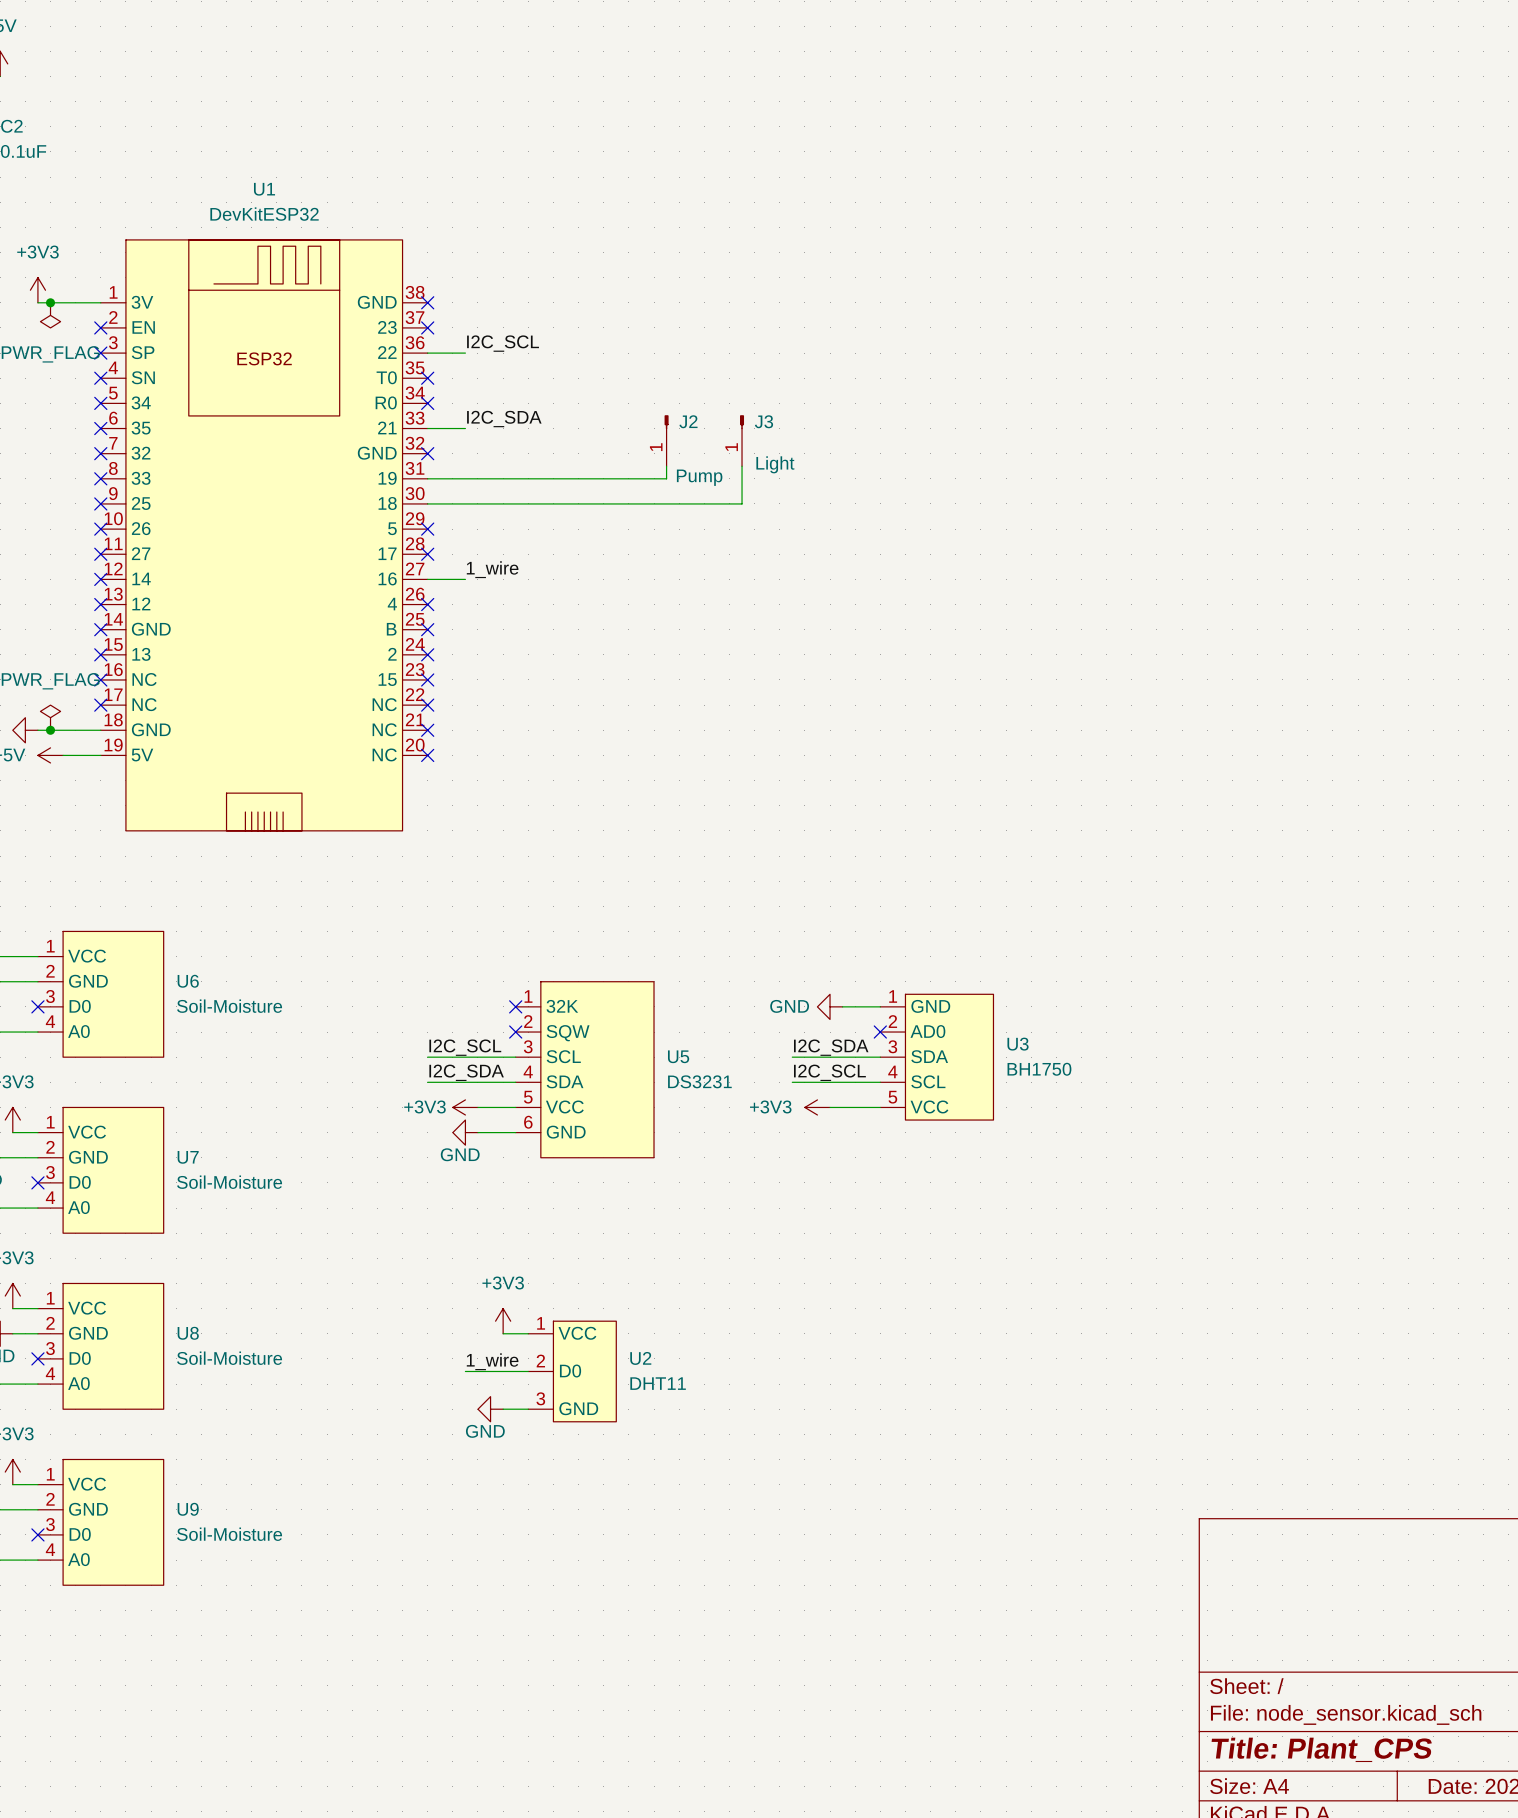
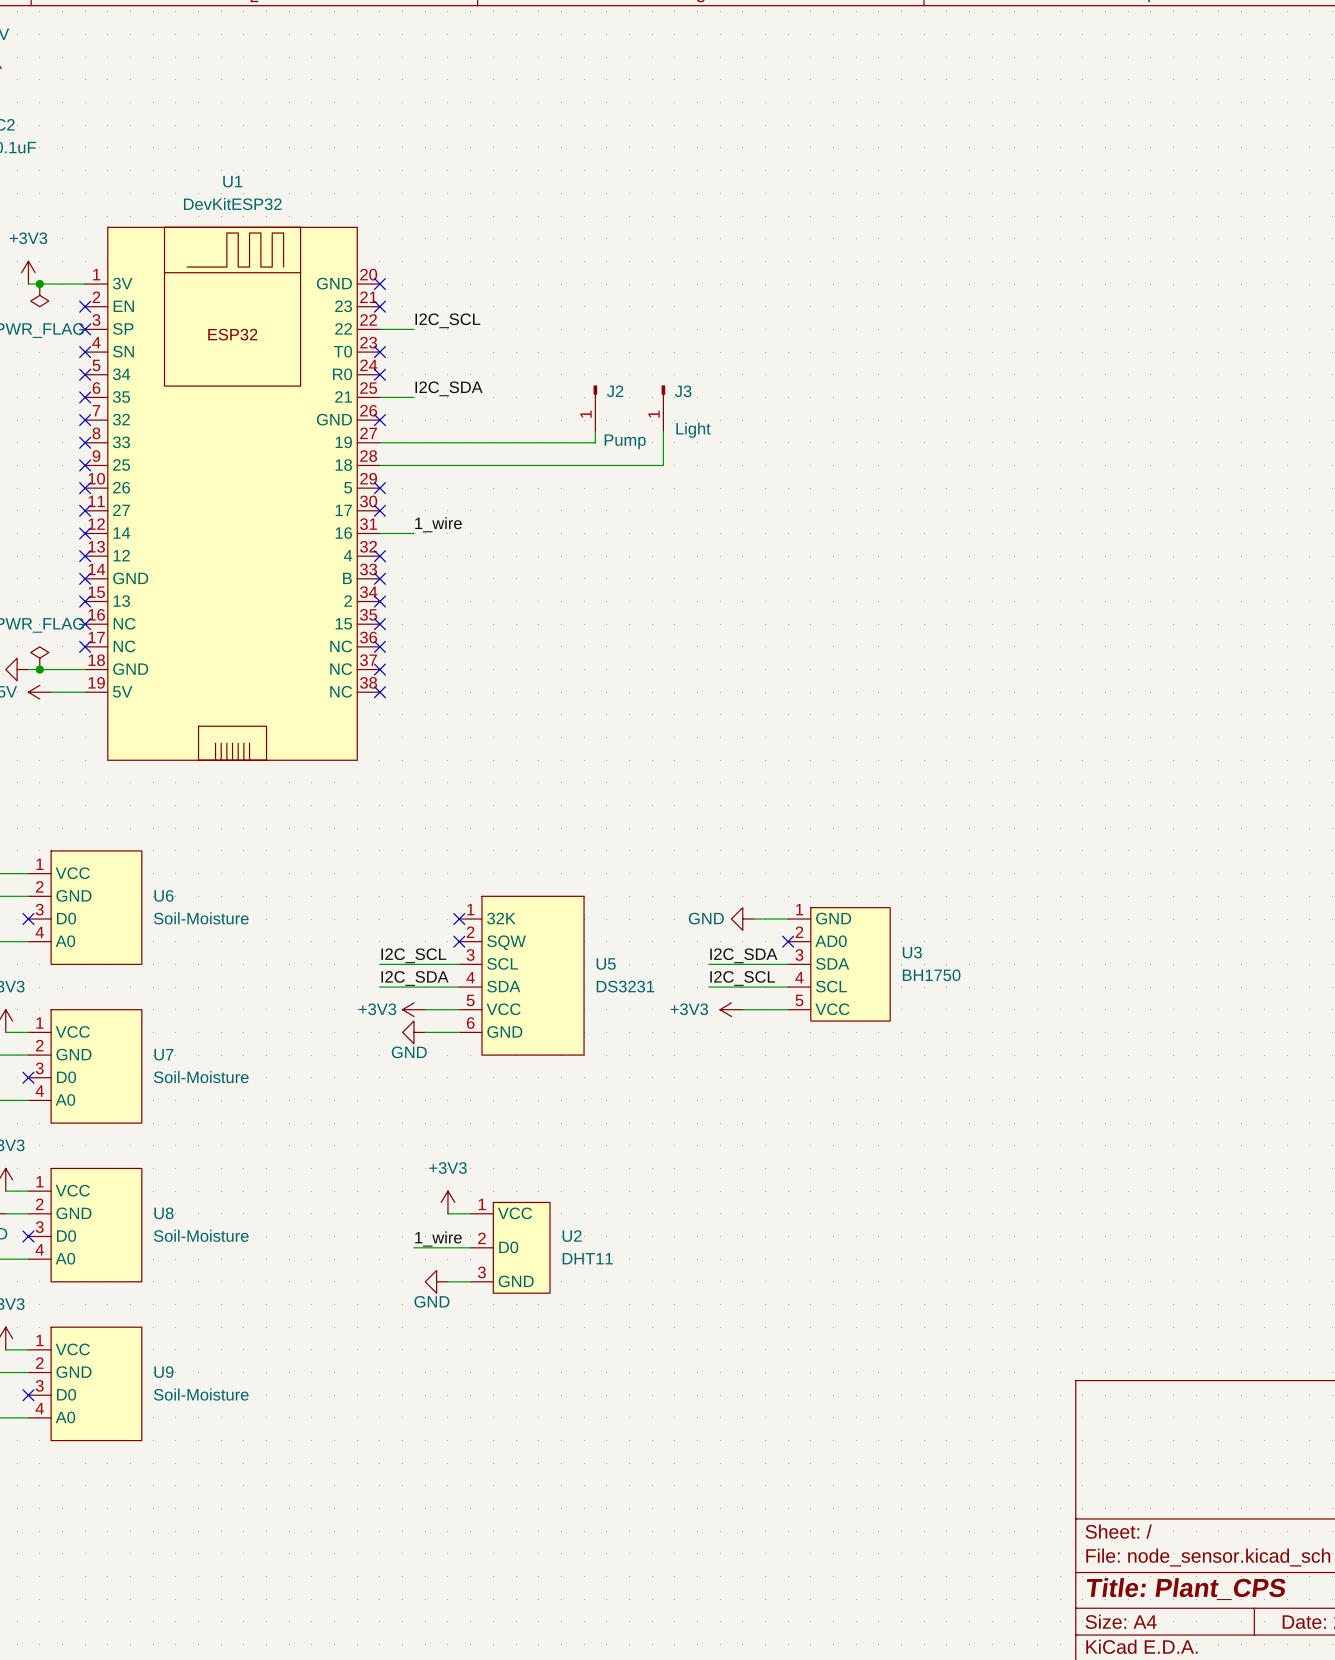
U1 symbol: [100, 239, 428, 831] -> [85, 227, 380, 761]

